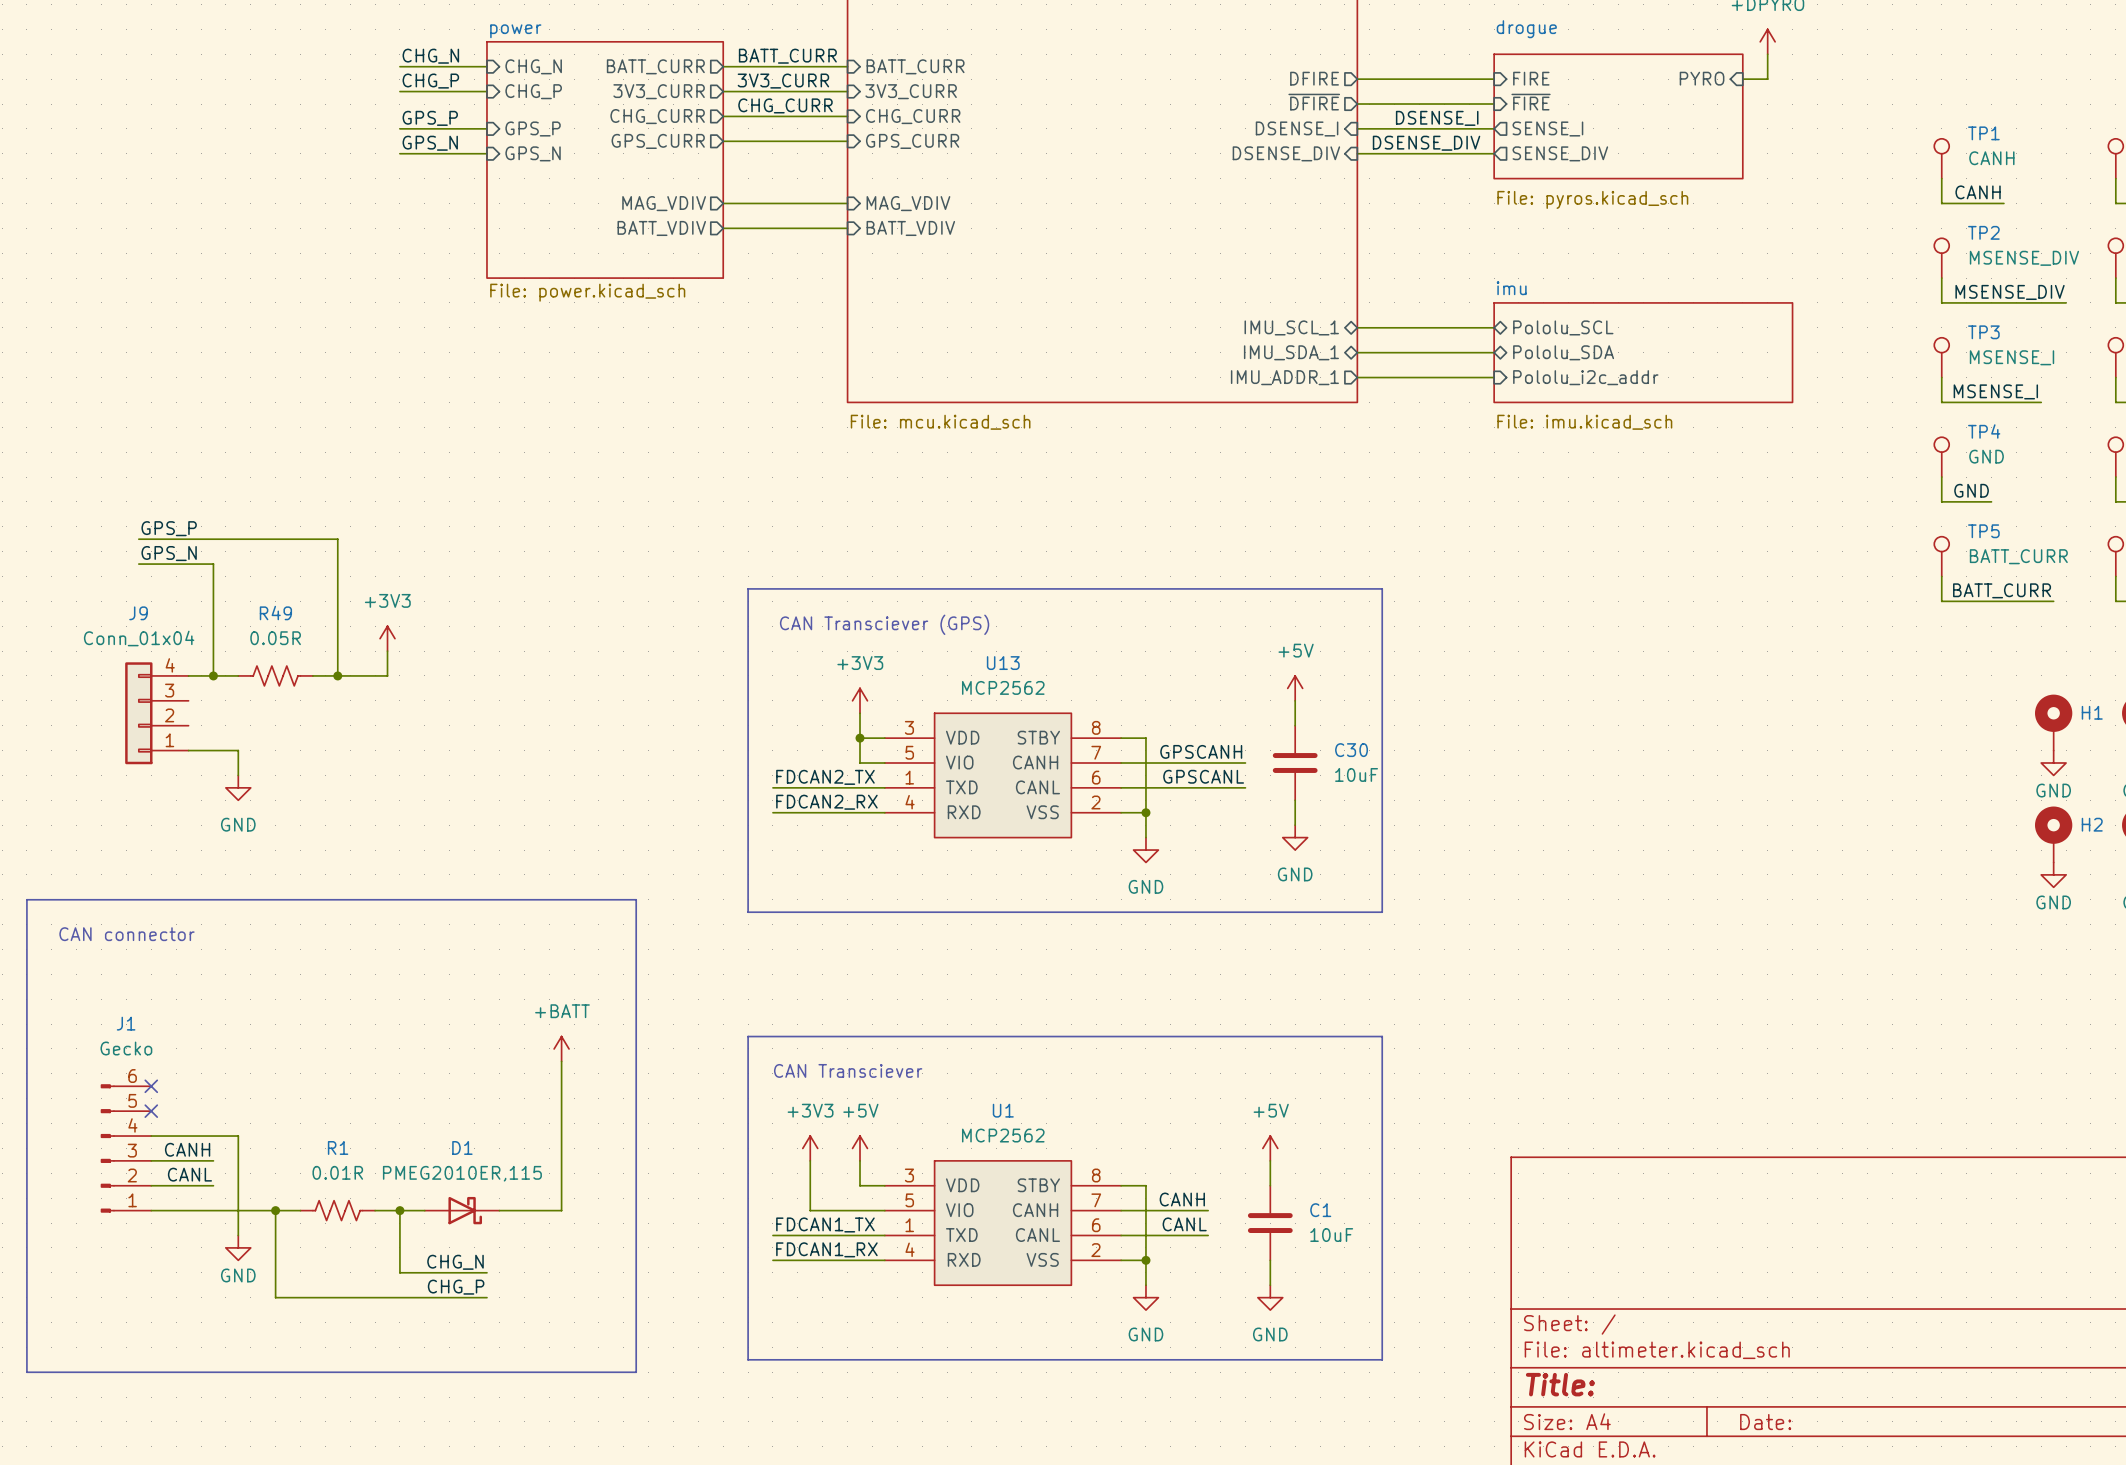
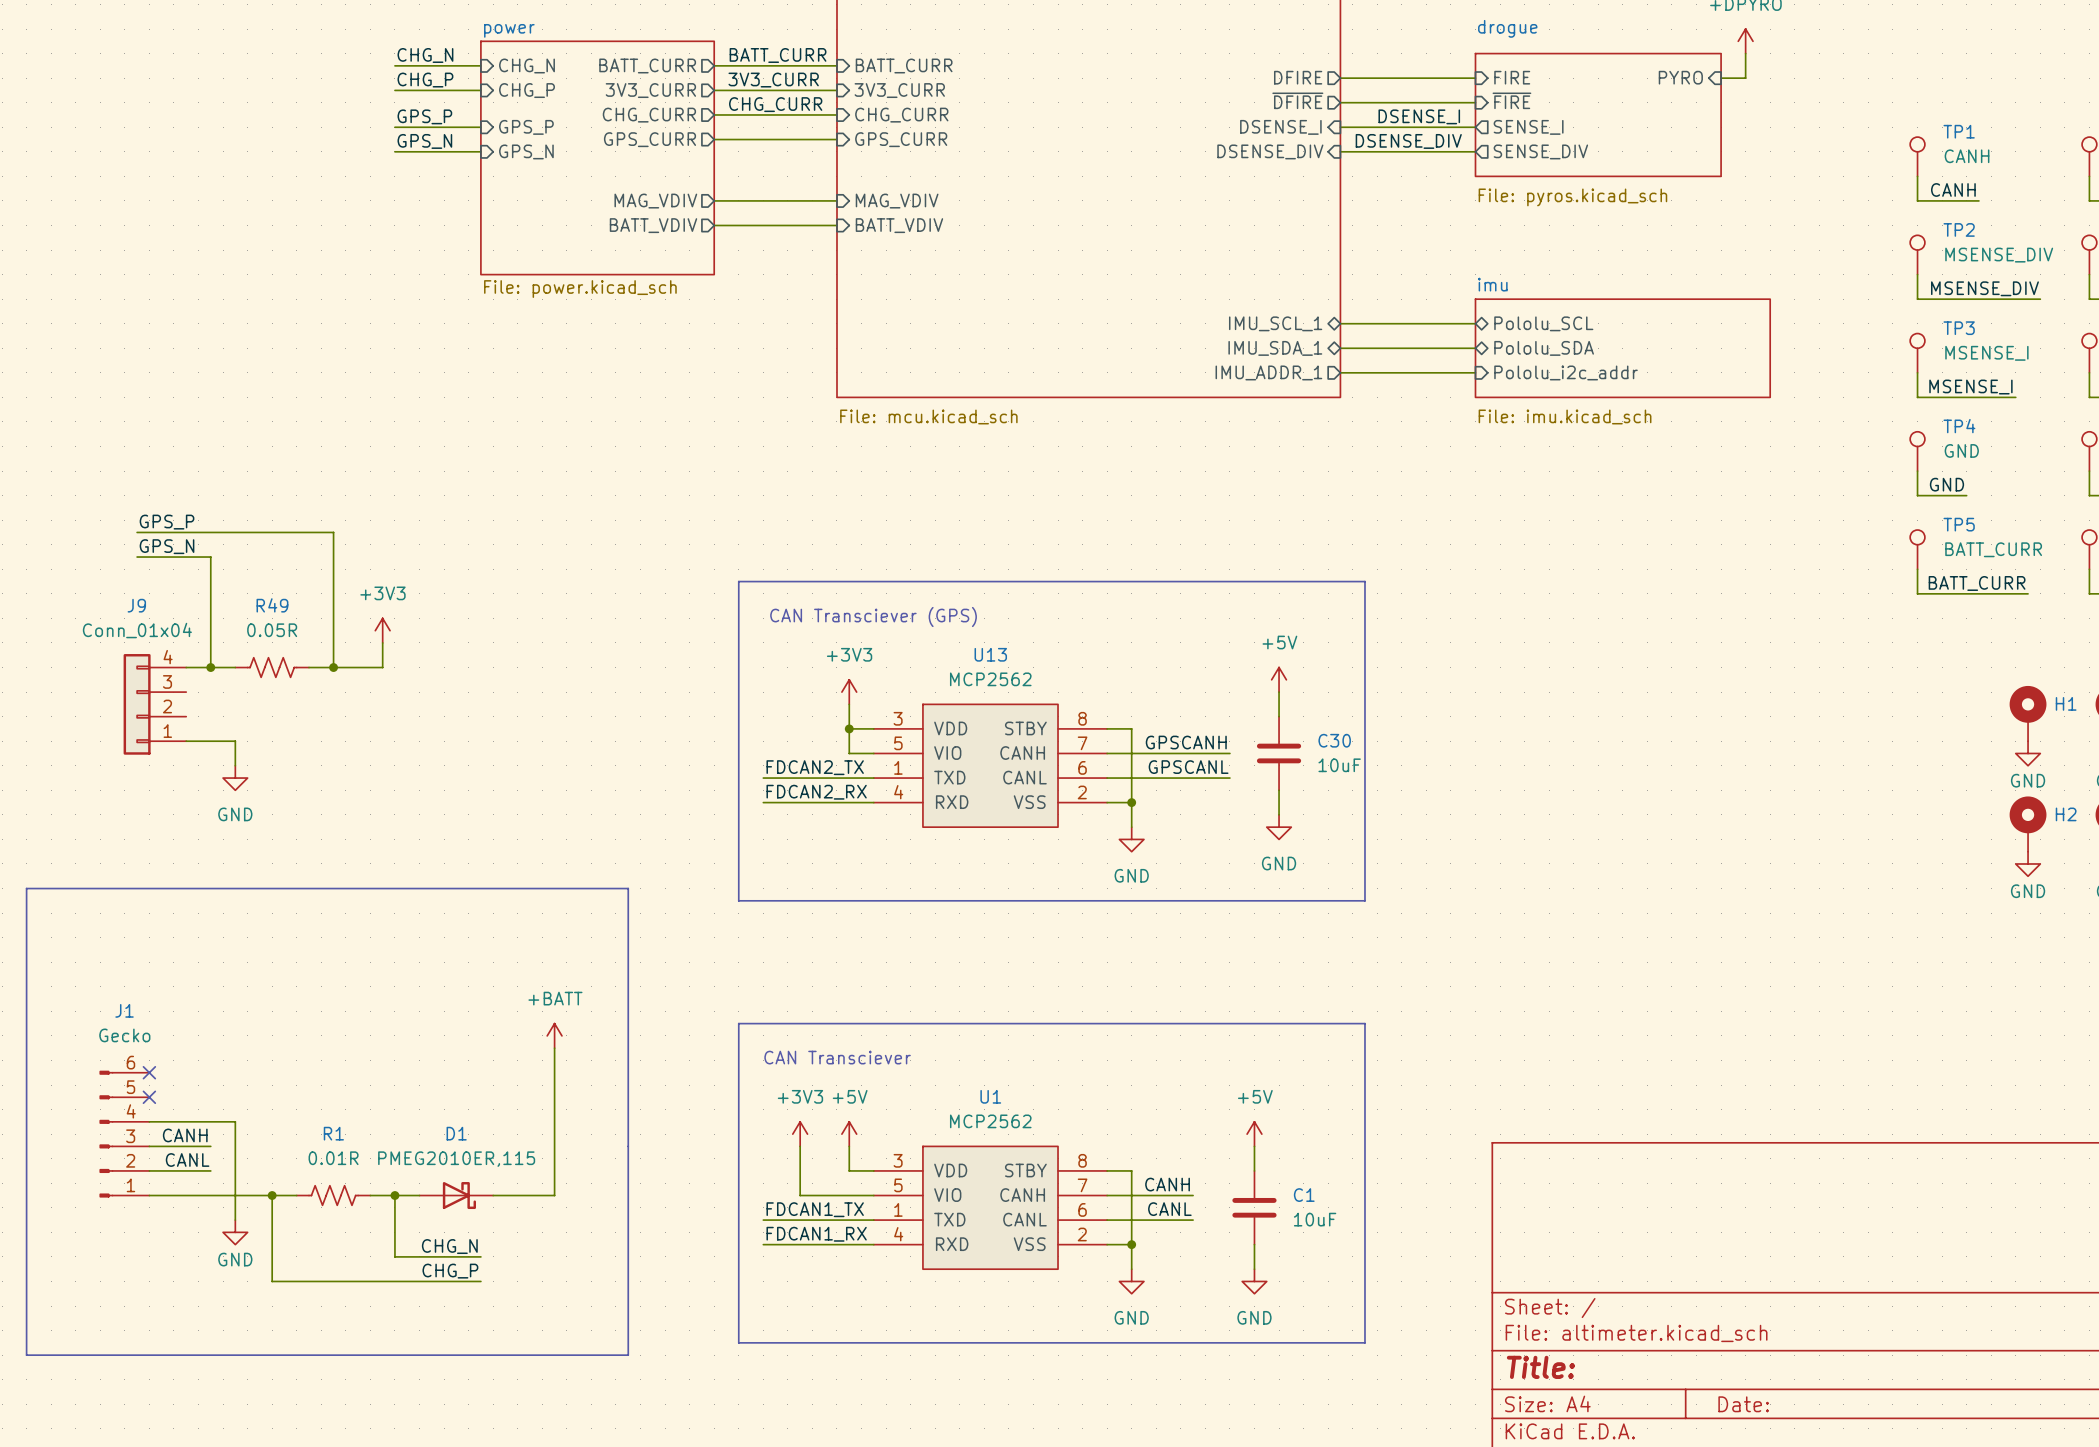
text: CAN connector (126, 934) -> none

